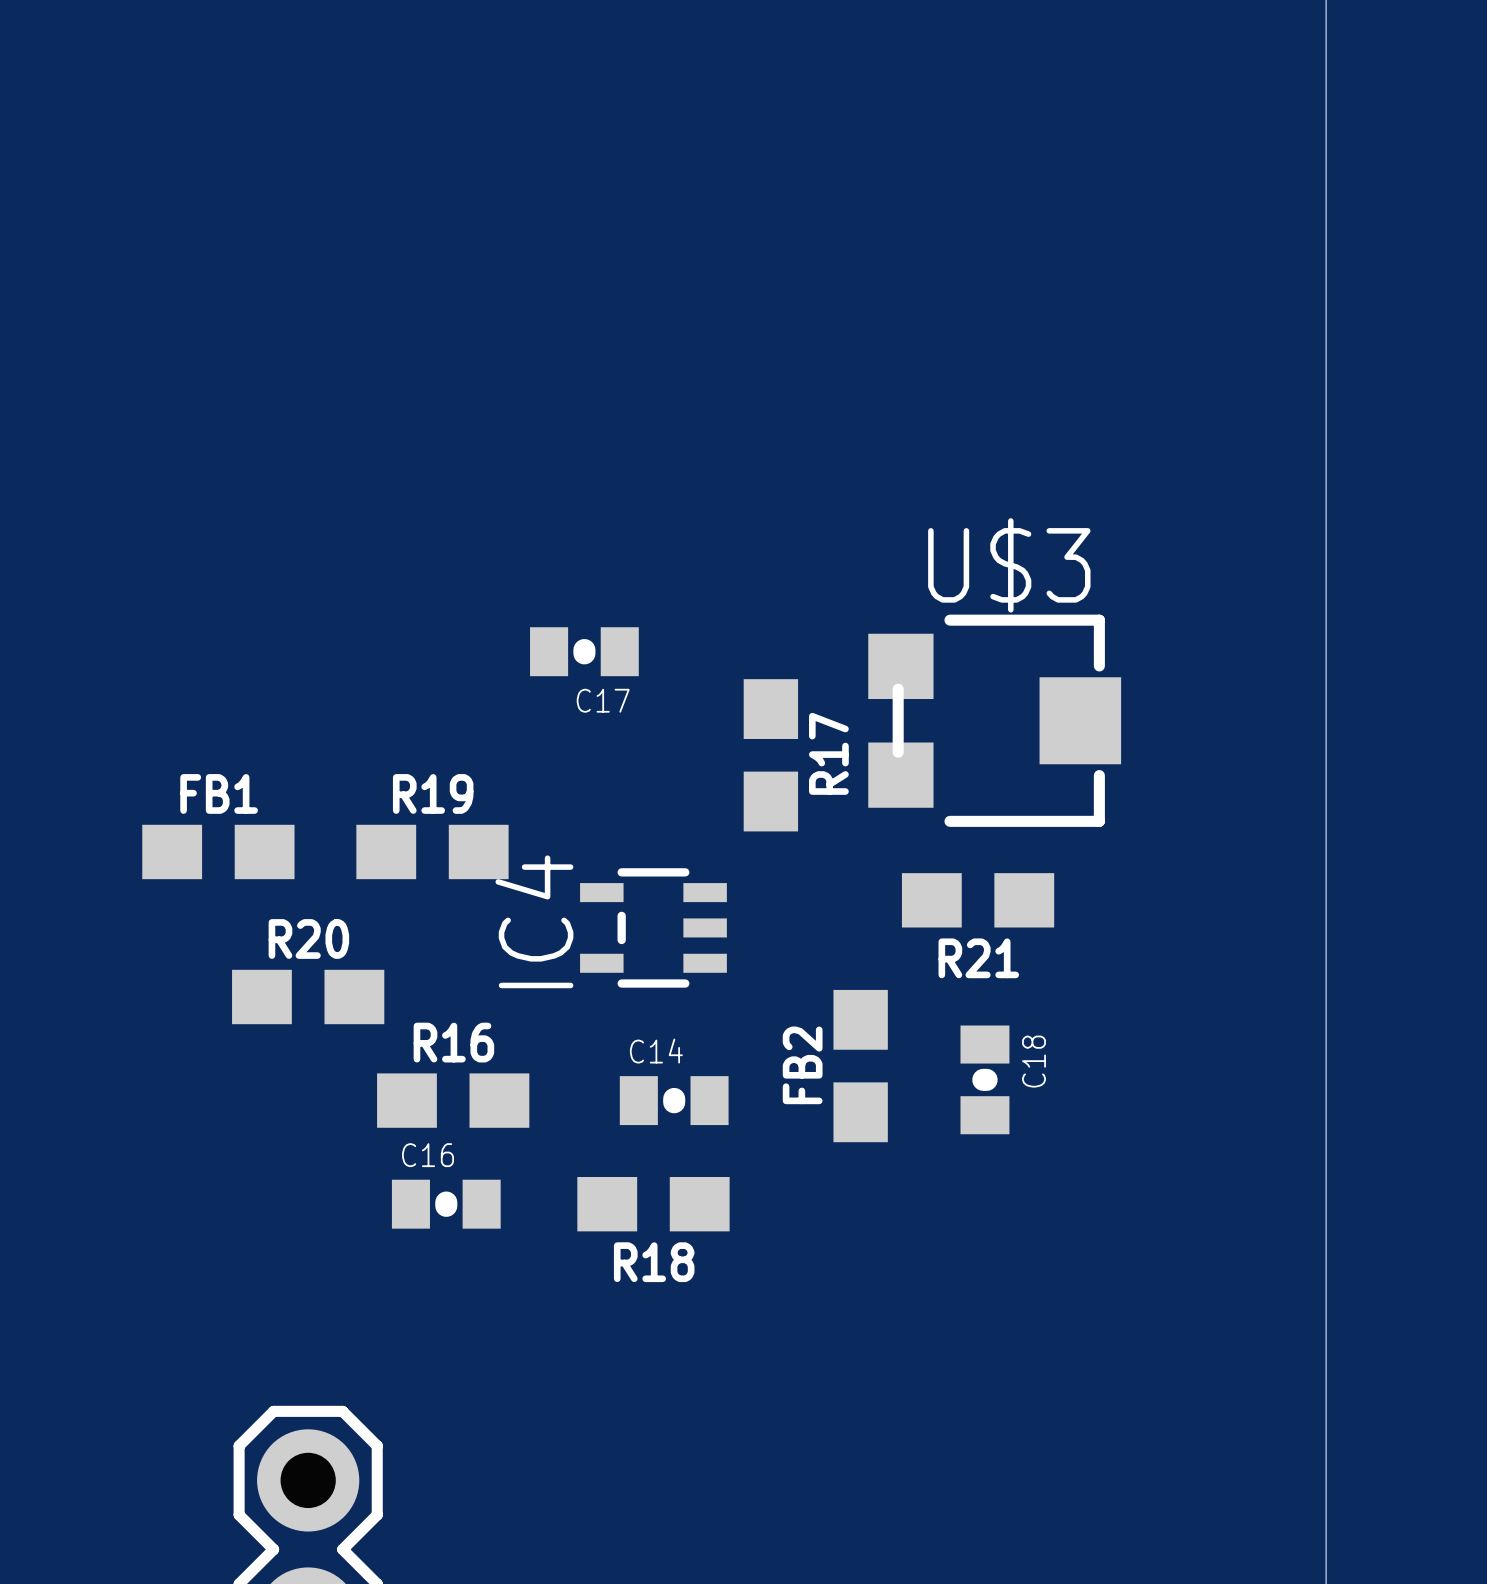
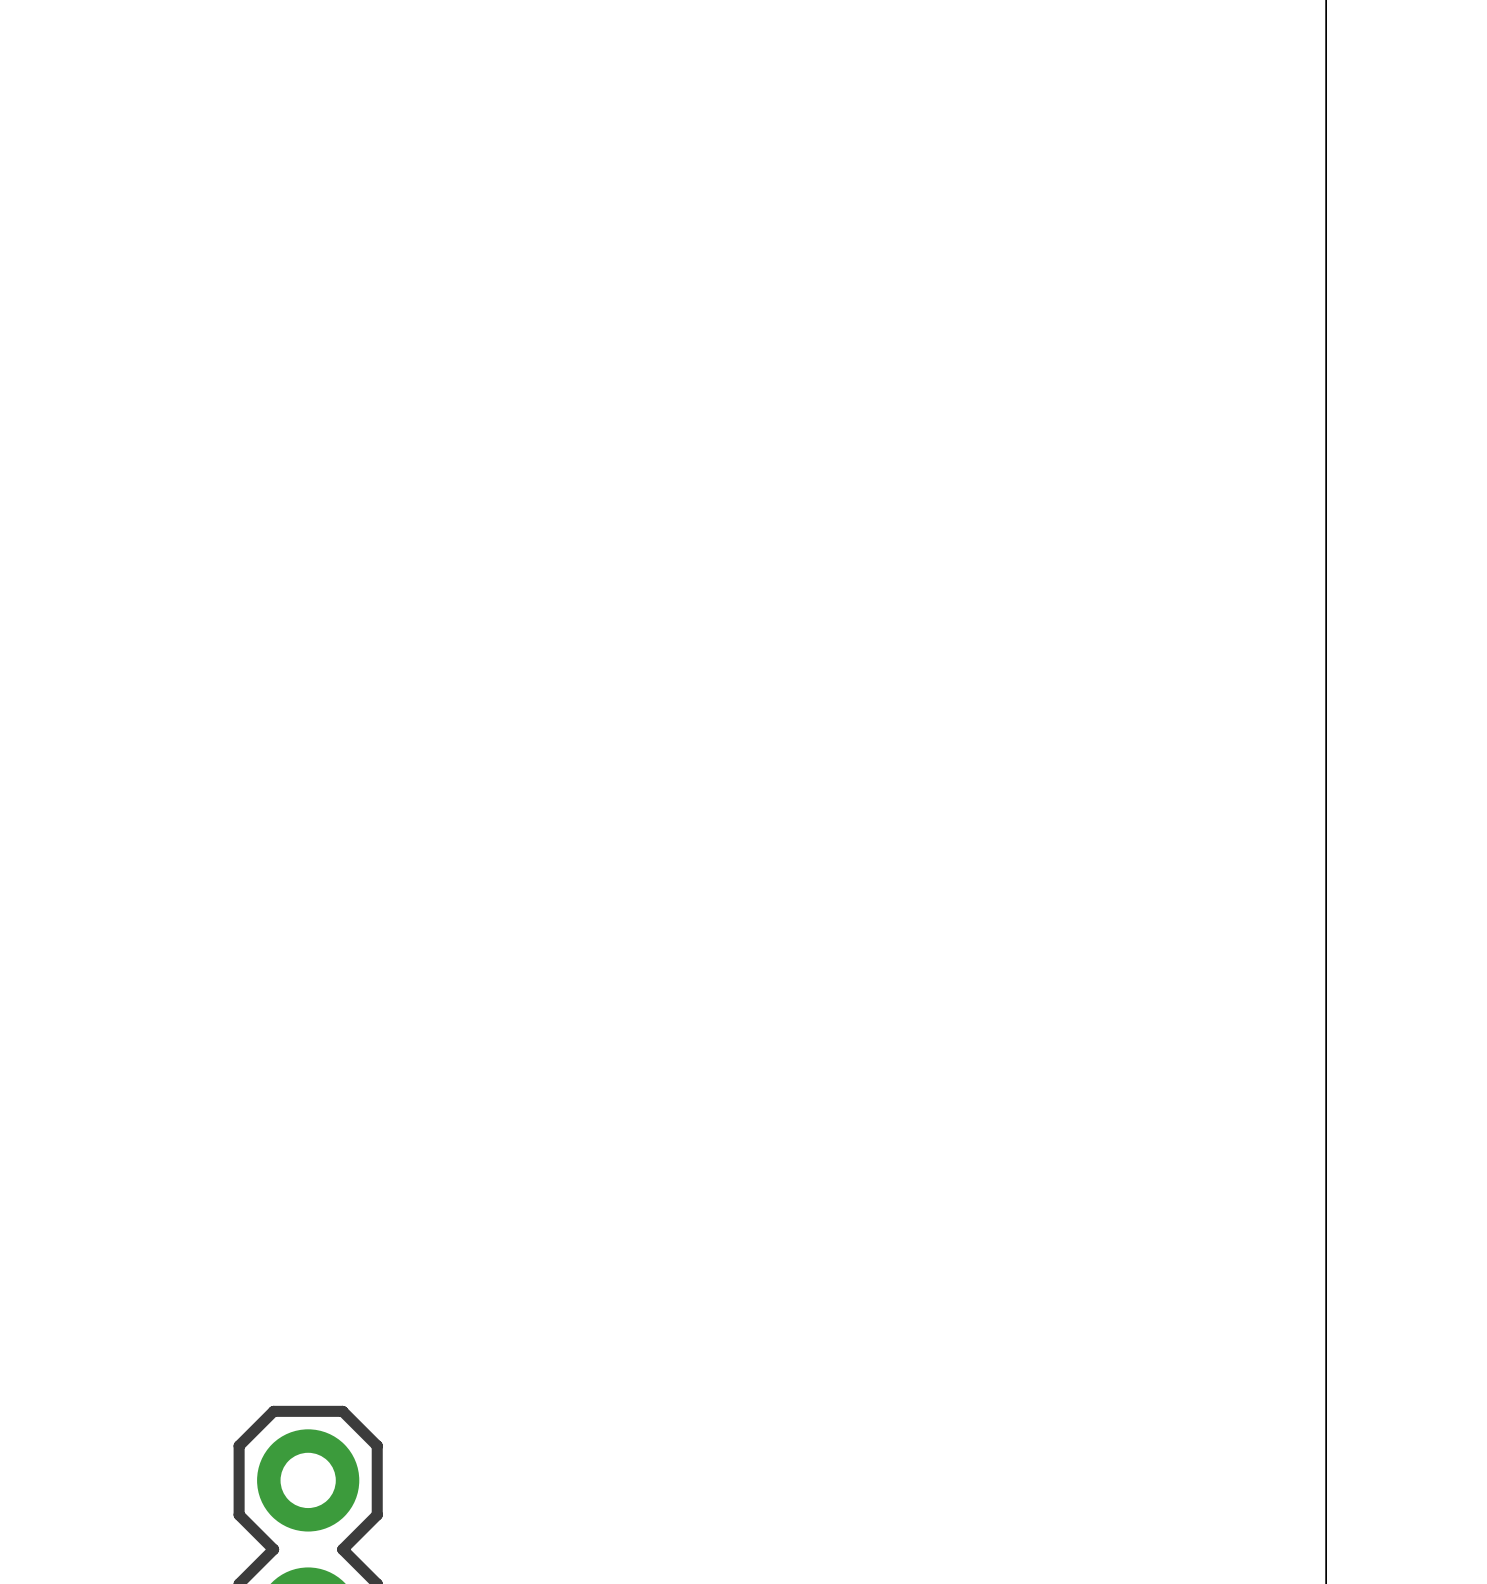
C17: (584, 651) -> none
U$3: (994, 720) -> none
R17: (770, 755) -> none
FB1: (218, 851) -> none
R19: (432, 851) -> none
R21: (978, 900) -> none
IC4: (653, 927) -> none
R20: (308, 997) -> none
FB2: (860, 1066) -> none
C18: (984, 1079) -> none
R16: (453, 1100) -> none
C14: (674, 1100) -> none
C16: (446, 1204) -> none
R18: (653, 1204) -> none

